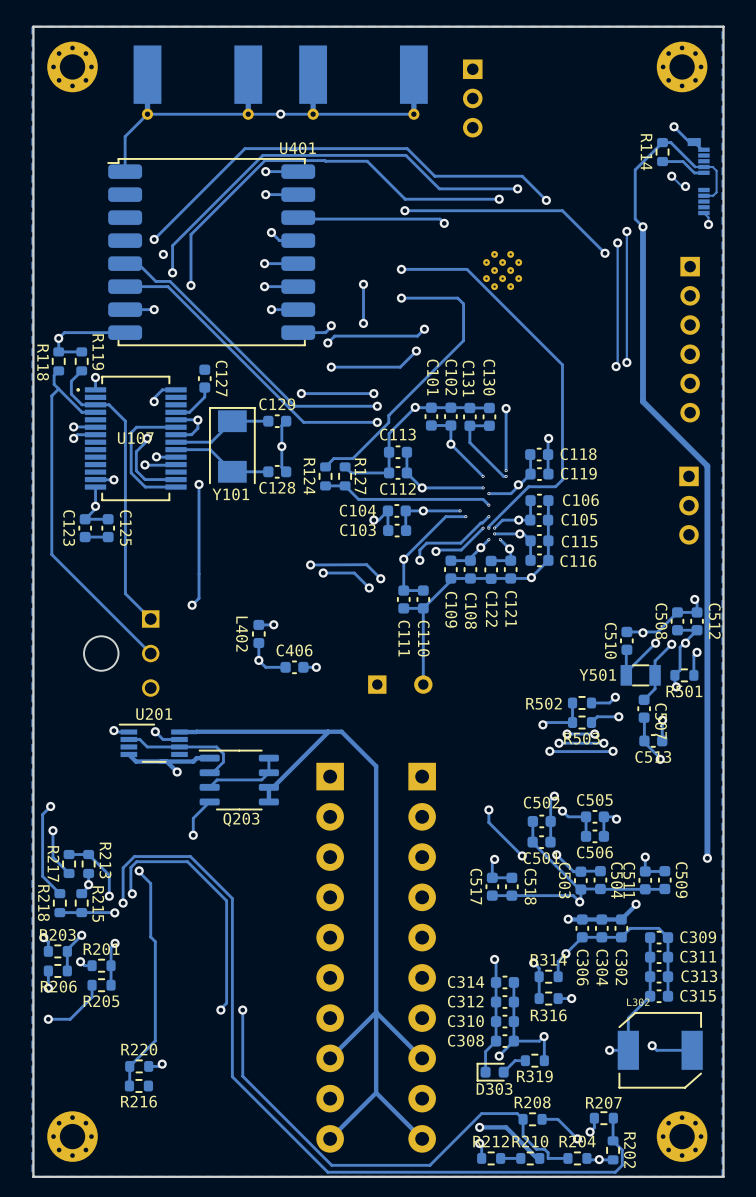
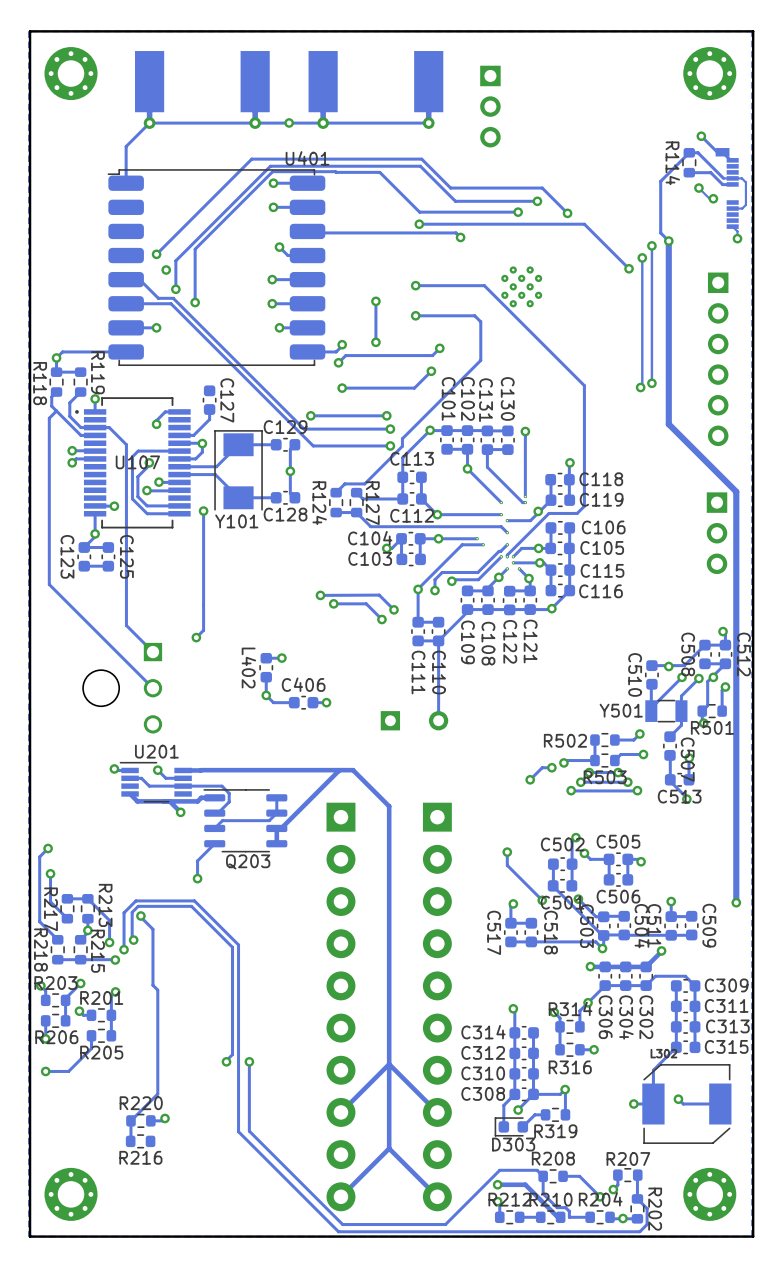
track: none -> (551, 767) (542, 767) (530, 779)
via: none -> (551, 767)
via: none -> (530, 779)

